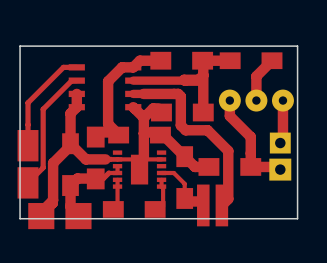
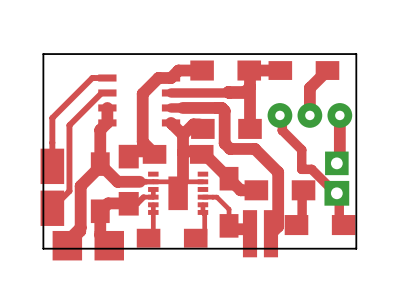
top track: none -> (282, 113) (282, 130) (301, 149) (301, 169) (311, 169) (330, 188) (339, 188) (339, 220) (343, 225)
top track: (229, 100) (229, 116) (250, 136) (250, 166) (277, 166) (280, 169) -> none
top track: none -> (302, 197) (302, 219) (296, 225)
part: none -> (320, 225)

